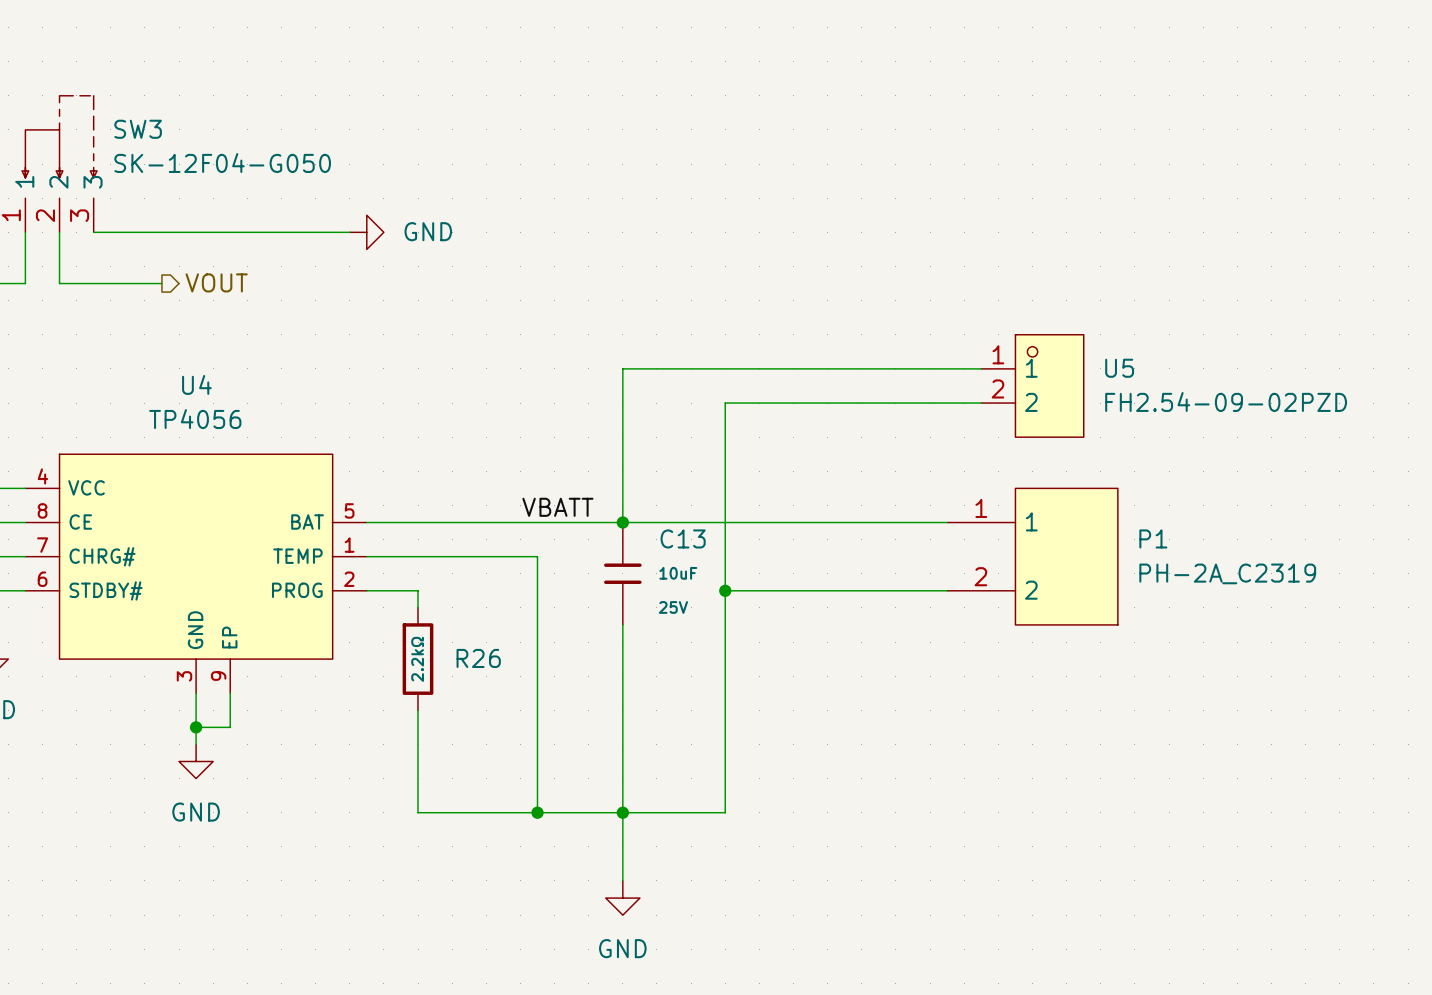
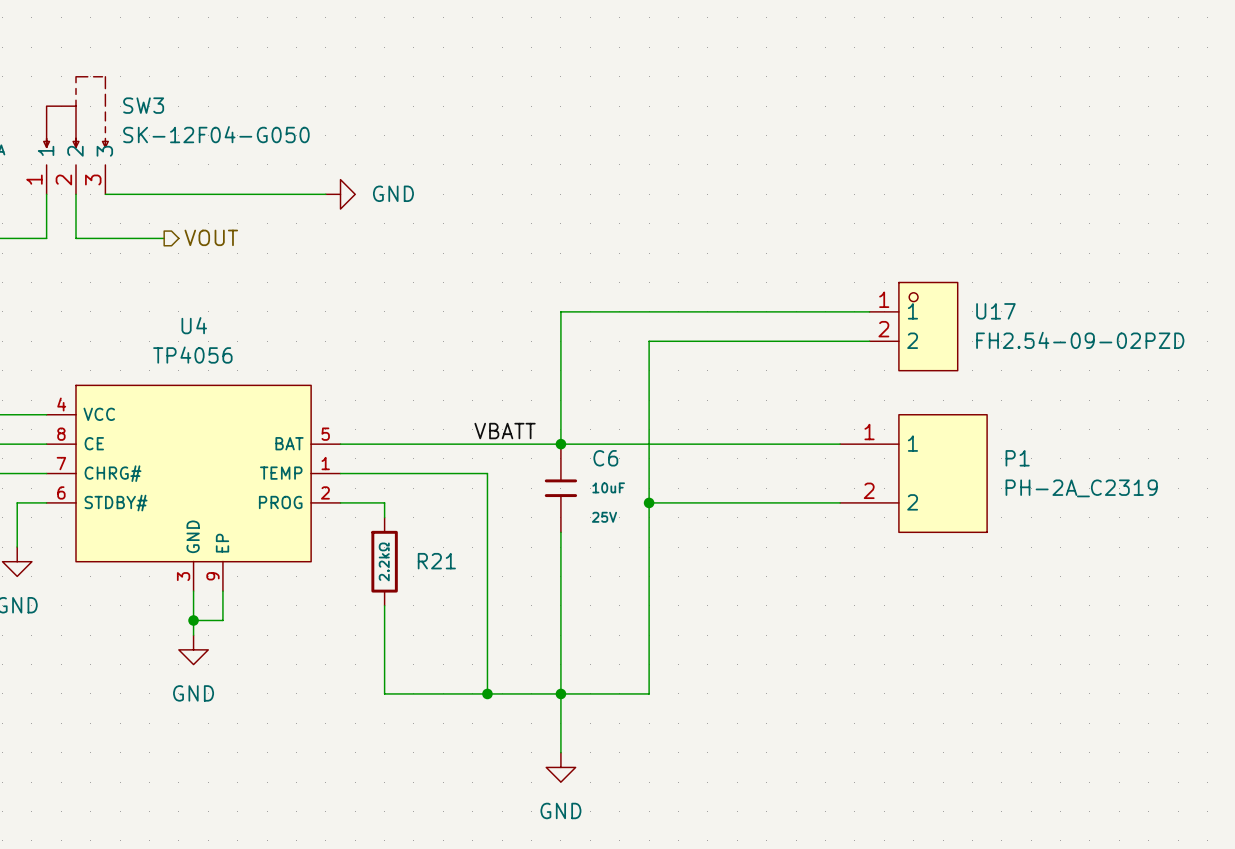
U5 name: U5 (1119, 368) -> U17 (995, 311)
C13 name: C13 (683, 538) -> C6 (605, 458)
R26 name: R26 (478, 658) -> R21 (436, 561)

